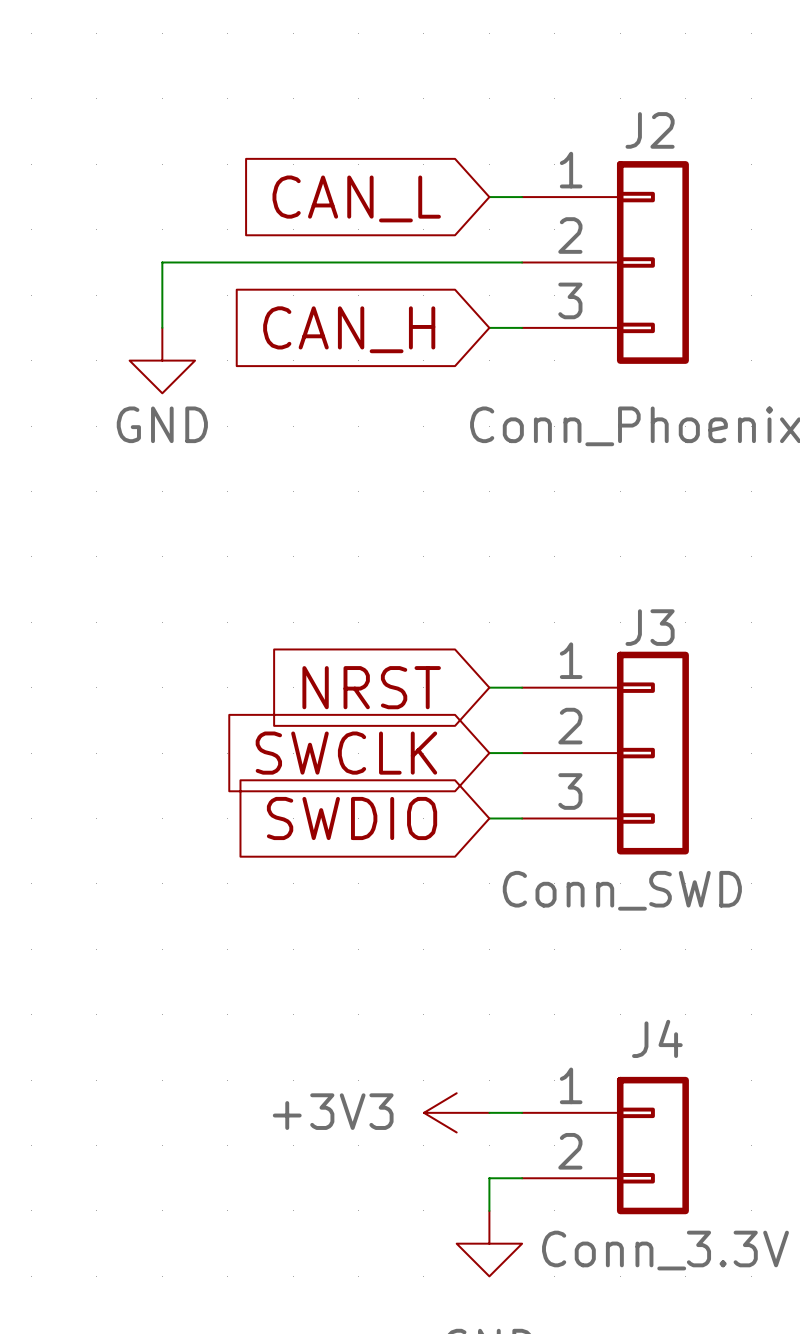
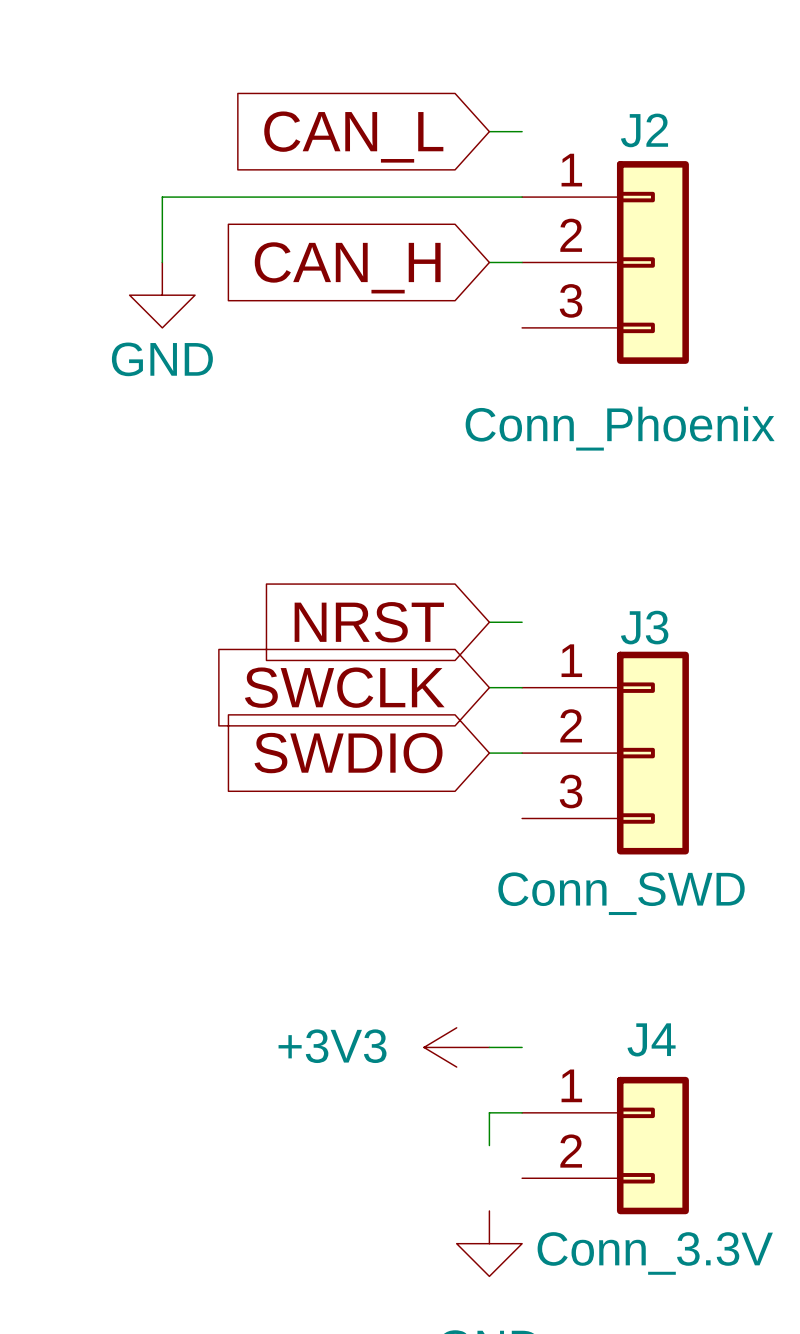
global label position: CAN_L (356, 198) -> CAN_L (353, 137)
wire: (489, 262) (162, 262) (162, 327) -> (489, 197) (162, 197) (162, 262)
wire: (489, 327) (522, 327) -> (489, 131) (522, 131)
global label position: CAN_H (349, 329) -> CAN_H (347, 267)
power symbol position: GND (162, 360) -> GND (162, 295)
global label: none -> NRST (369, 622)
global label: NRST (371, 687) -> SWCLK (344, 687)
global label: SWCLK (346, 753) -> SWDIO (348, 753)
global label: SWDIO (352, 818) -> none
wire: (489, 818) (522, 818) -> (489, 622) (522, 622)
wire: none -> (489, 1047) (522, 1047)
power symbol position: +3V3 (456, 1112) -> +3V3 (456, 1047)
wire: none -> (489, 1112) (489, 1145)
wire: (522, 1178) (489, 1178) (489, 1210) -> none

